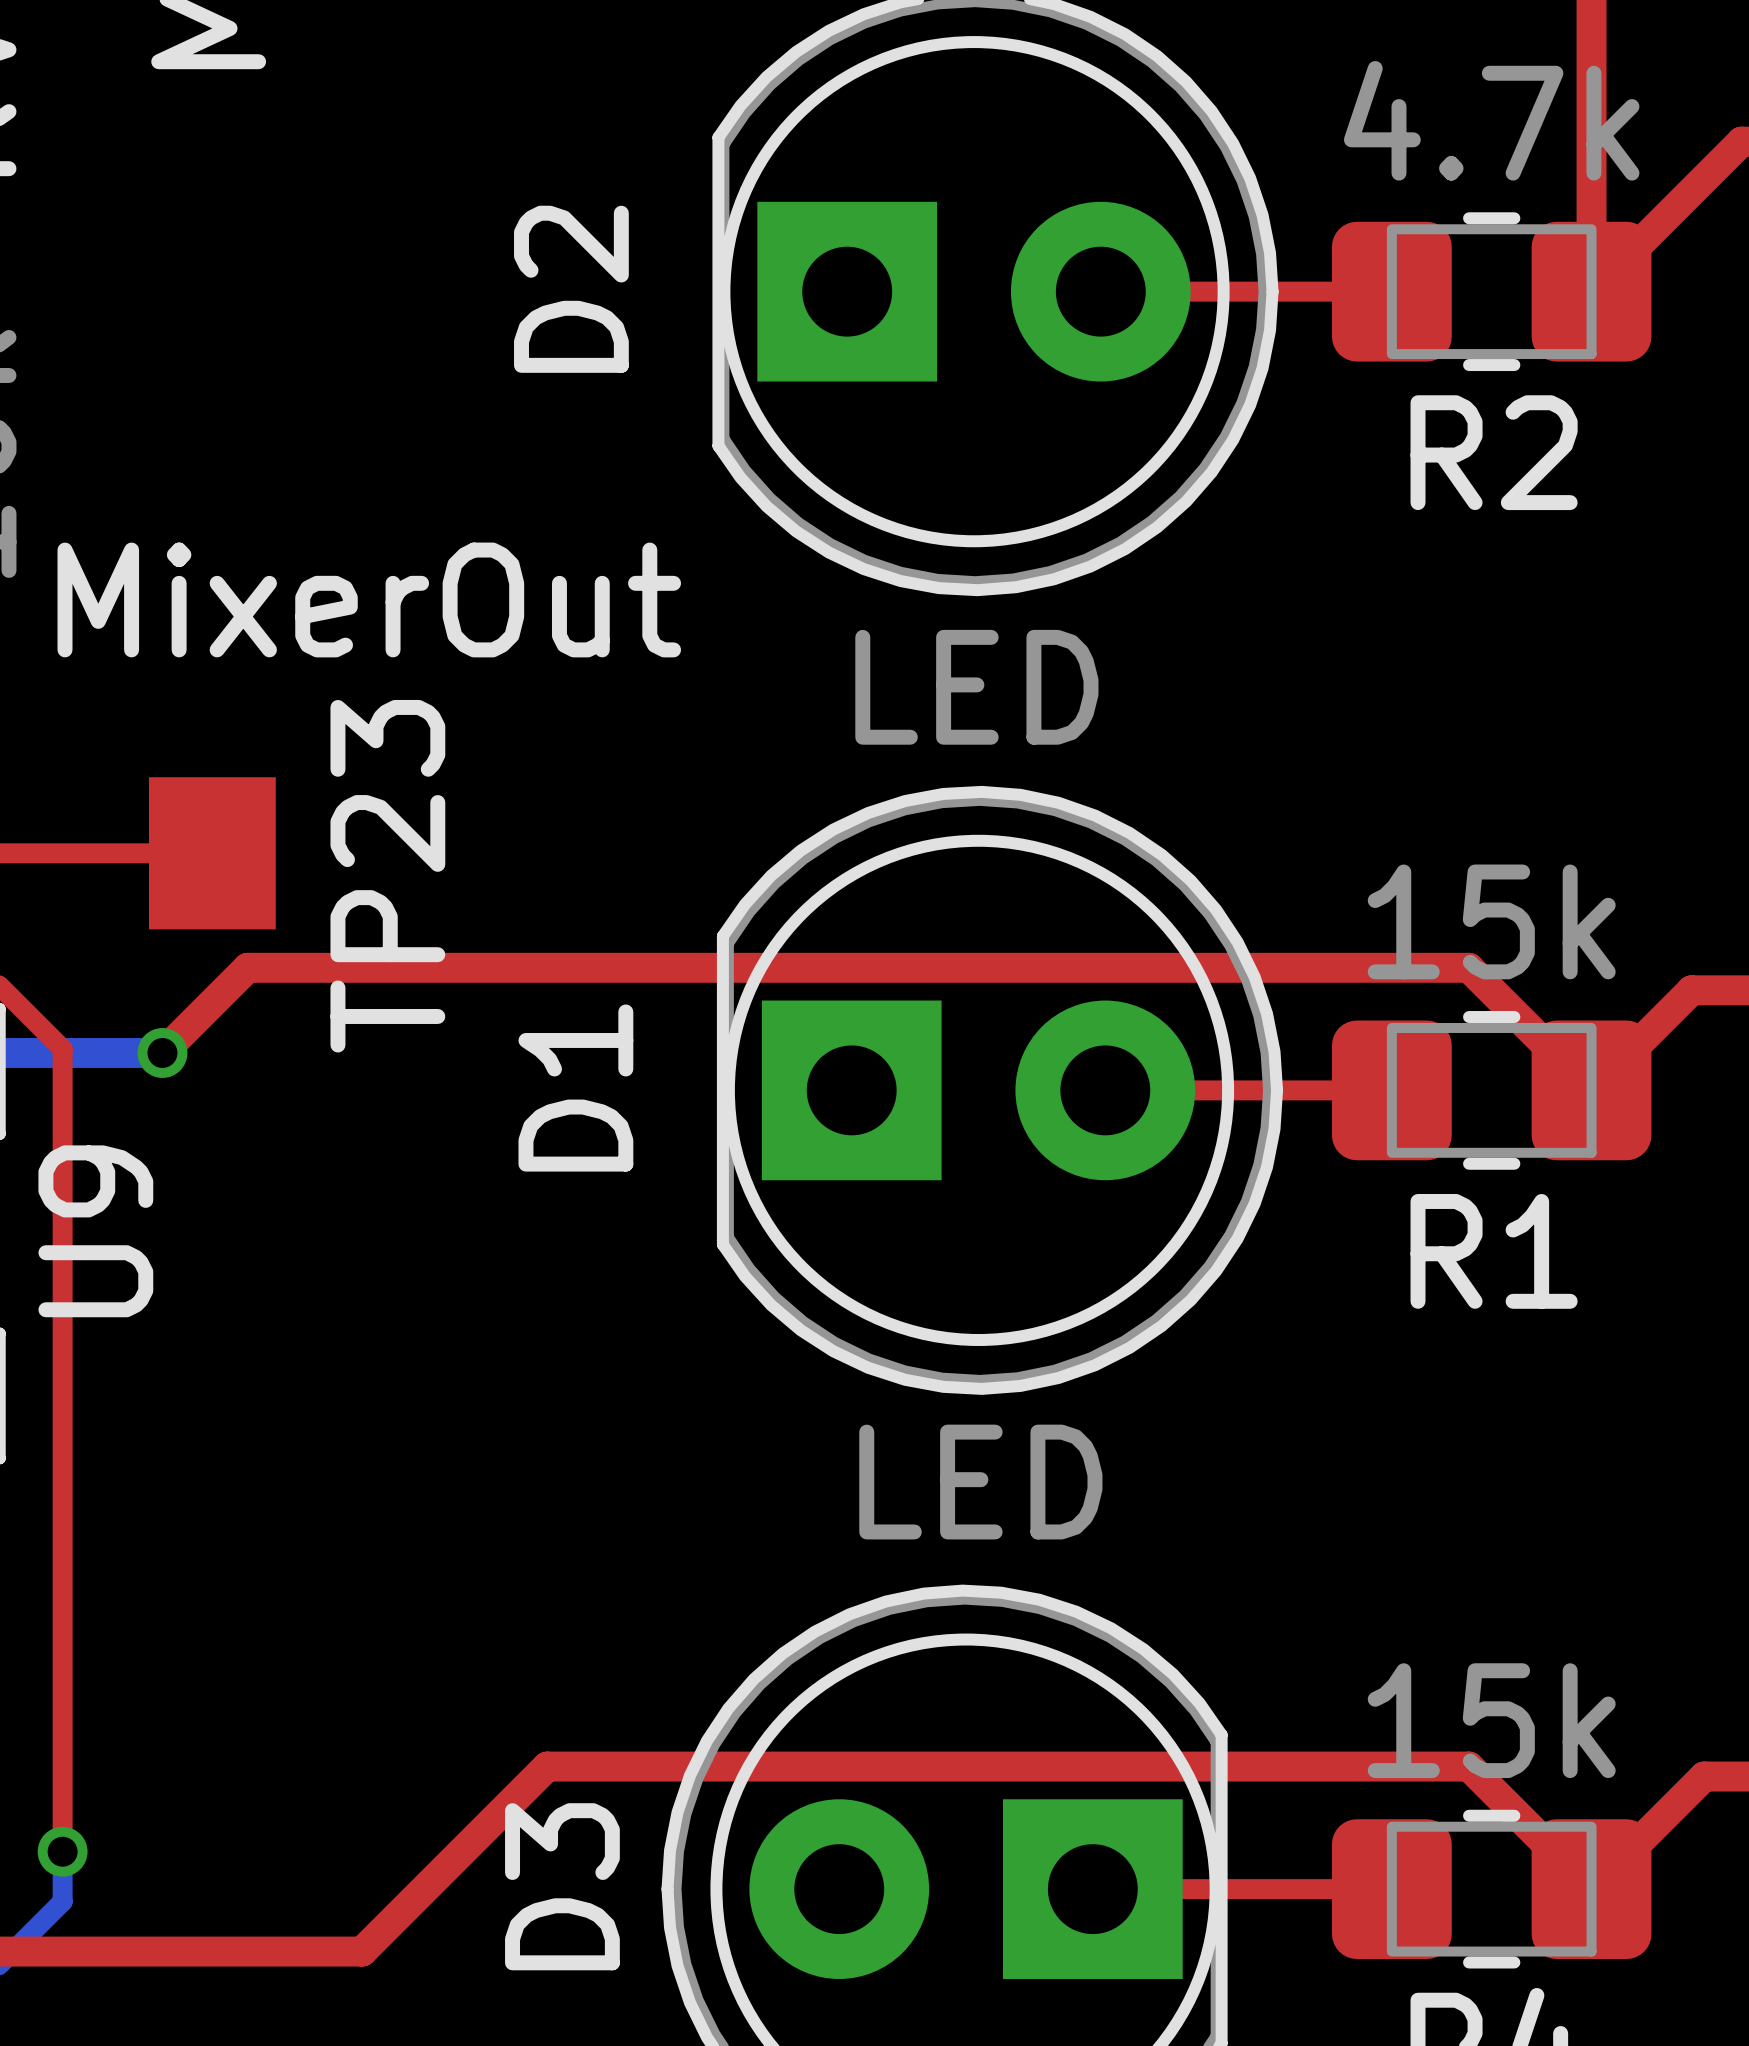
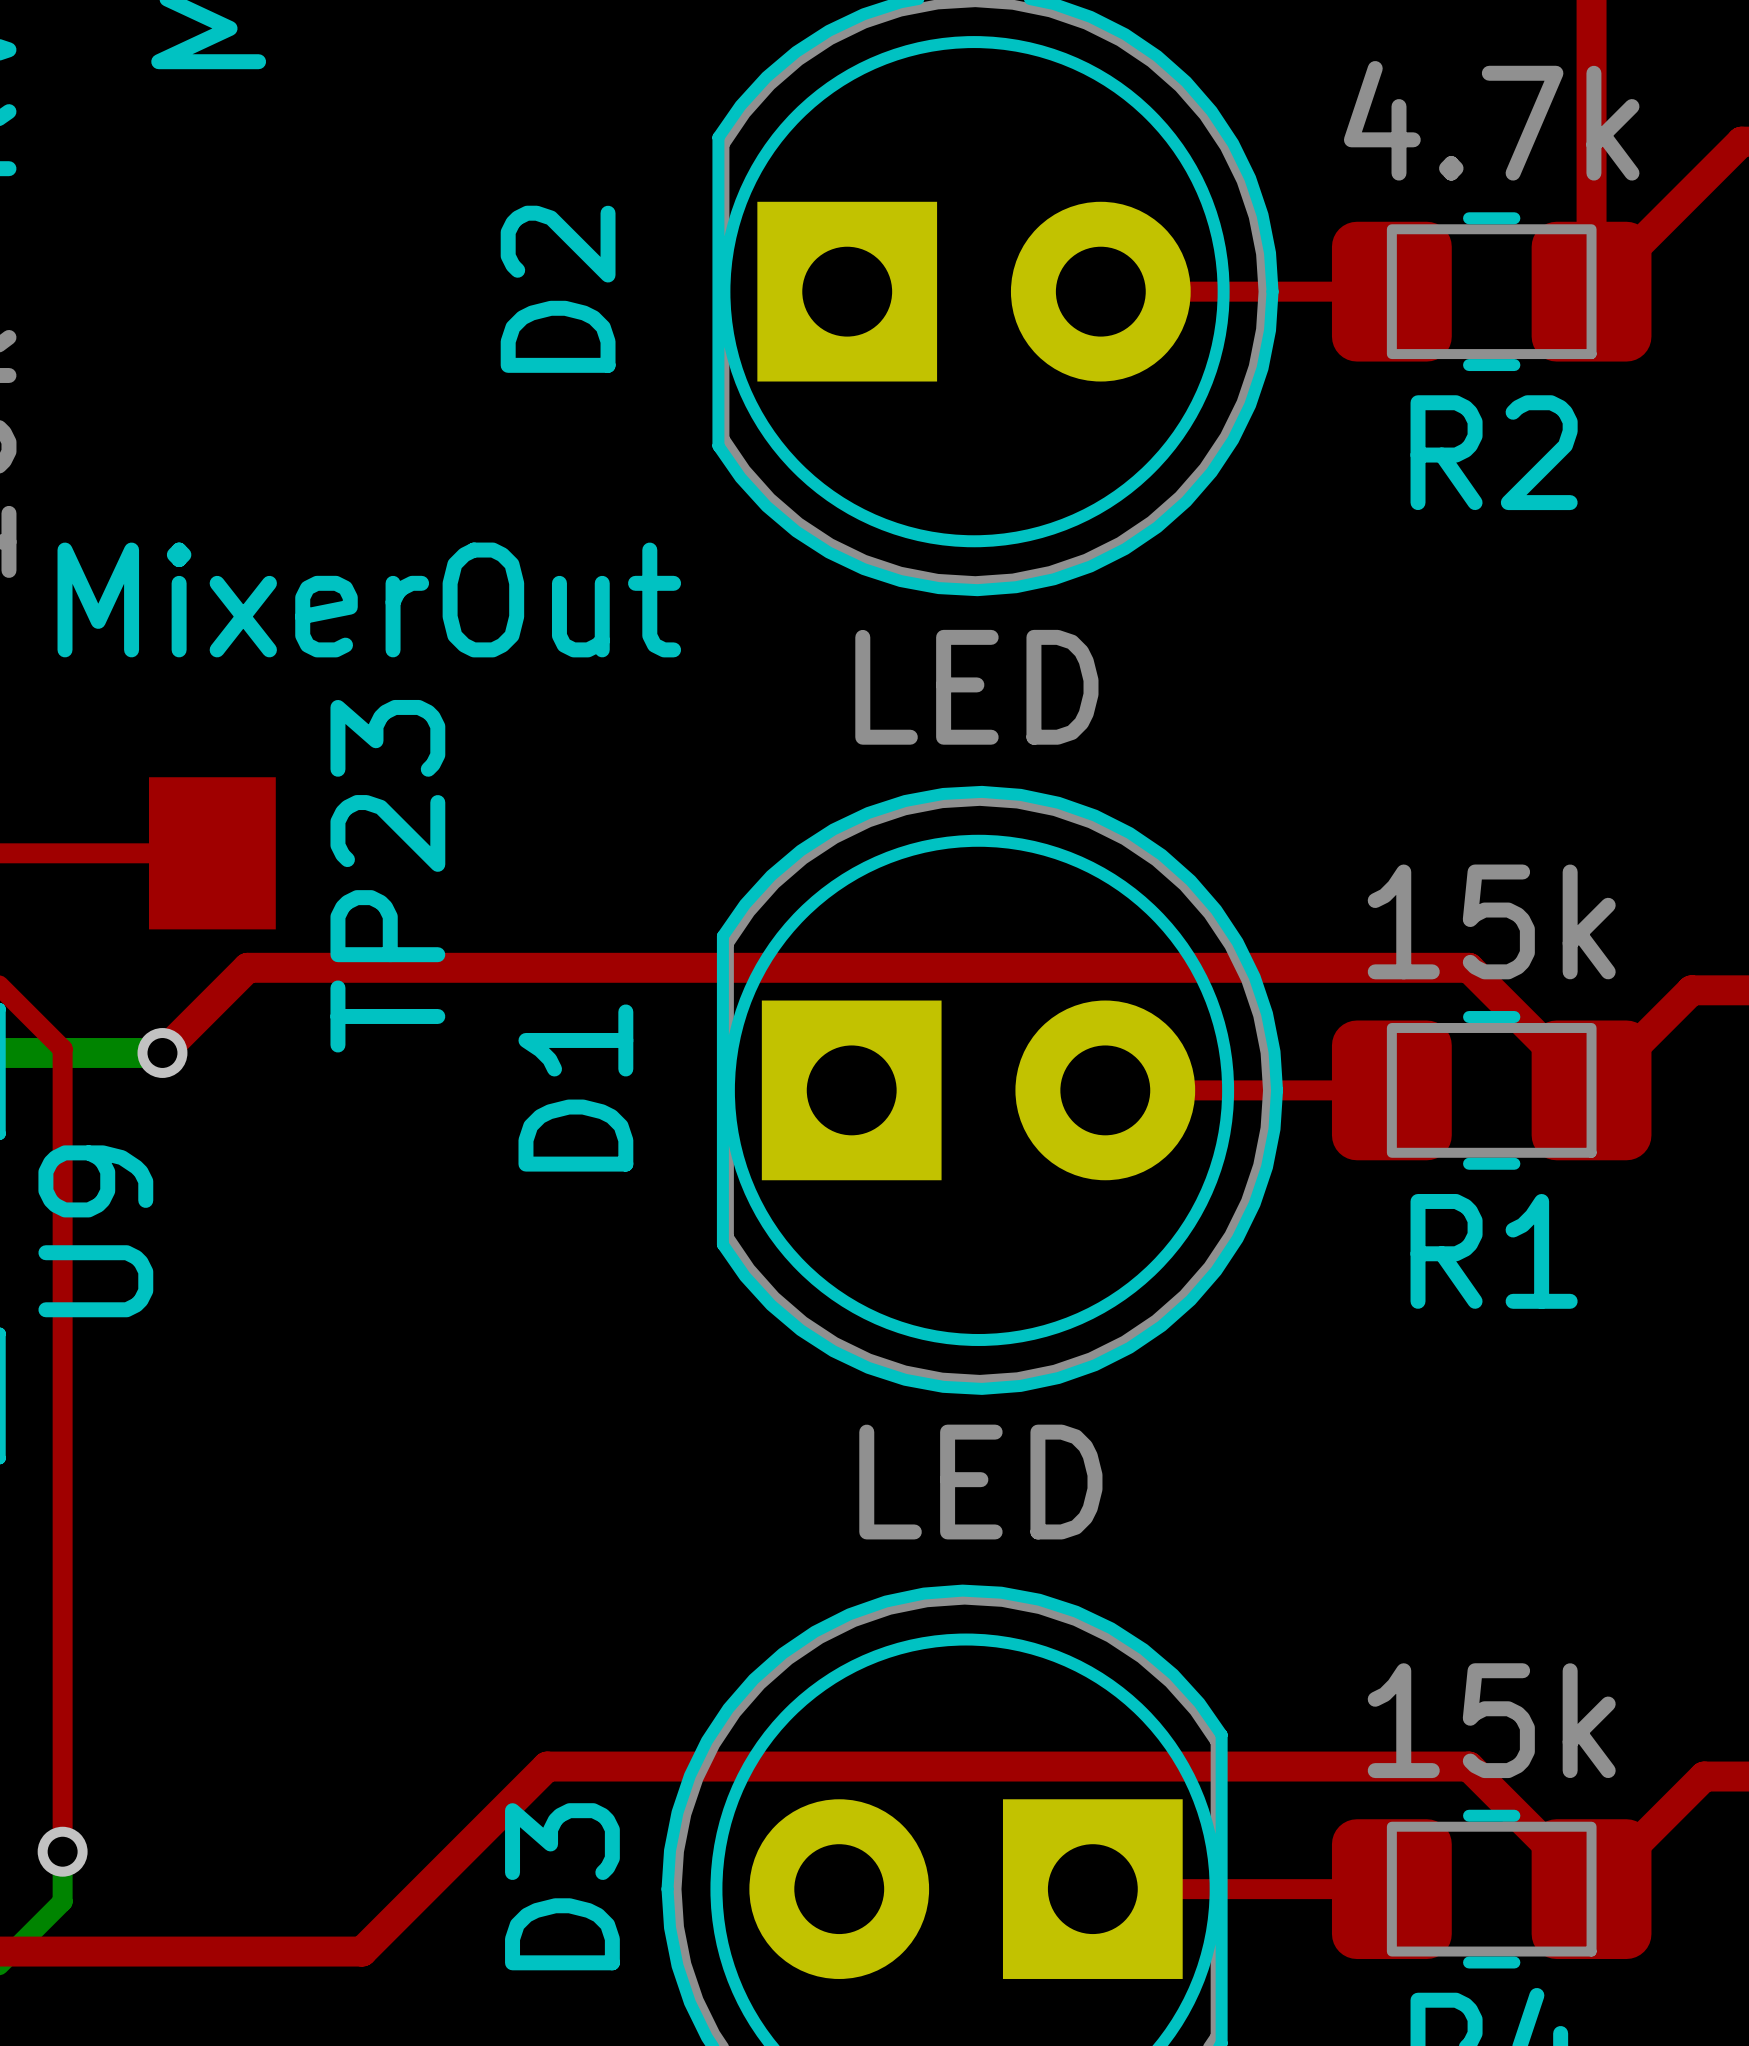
D2 name position: D2 (571, 289) -> D2 (558, 289)

